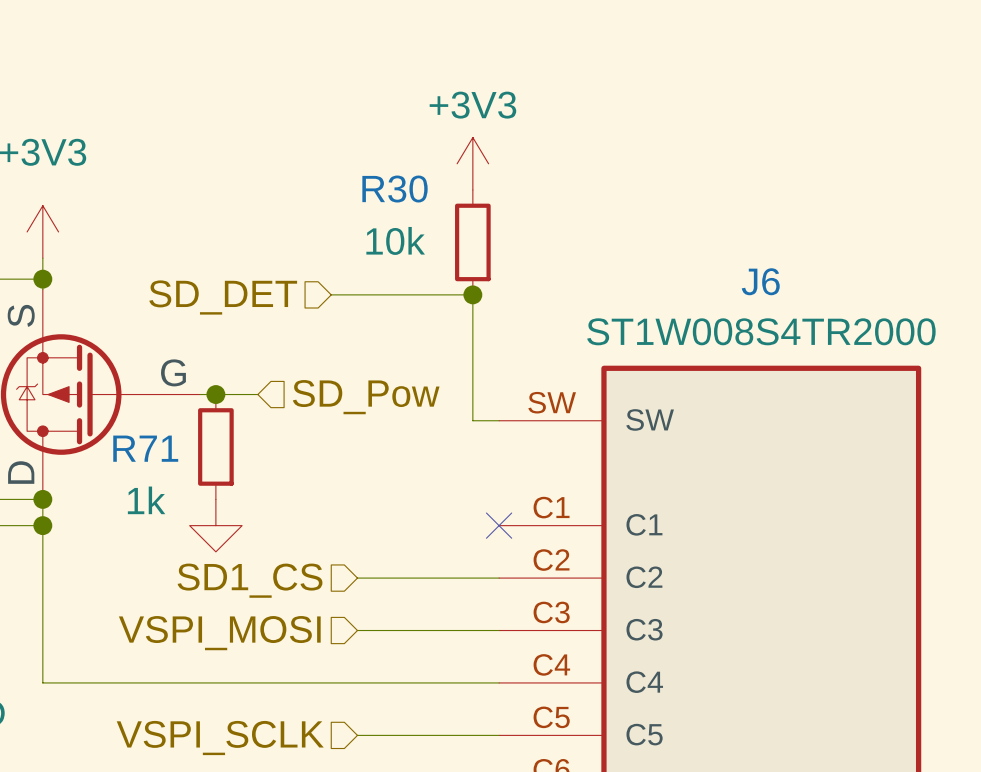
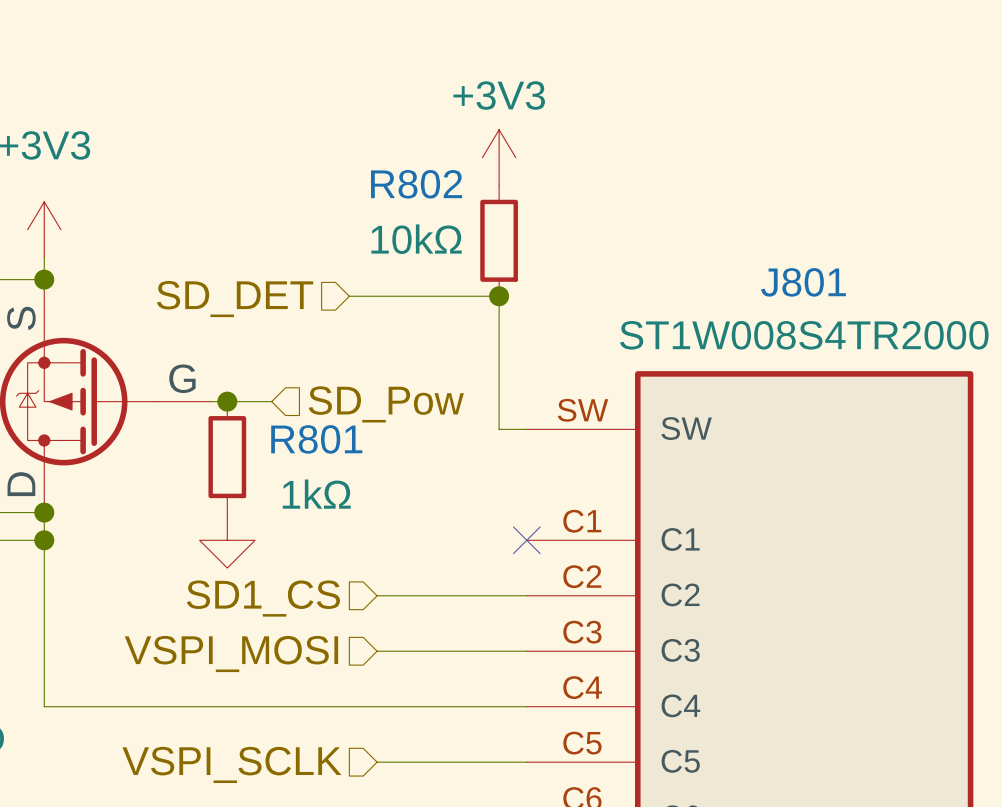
R30 name: R30 (395, 189) -> R802 (416, 184)
R30 value: 10k (395, 240) -> 10kΩ (416, 239)
J6 name: J6 (760, 281) -> J801 (803, 282)
R71 name: R71 (145, 448) -> R801 (316, 439)
R71 value: 1k (146, 500) -> 1kΩ (316, 494)

